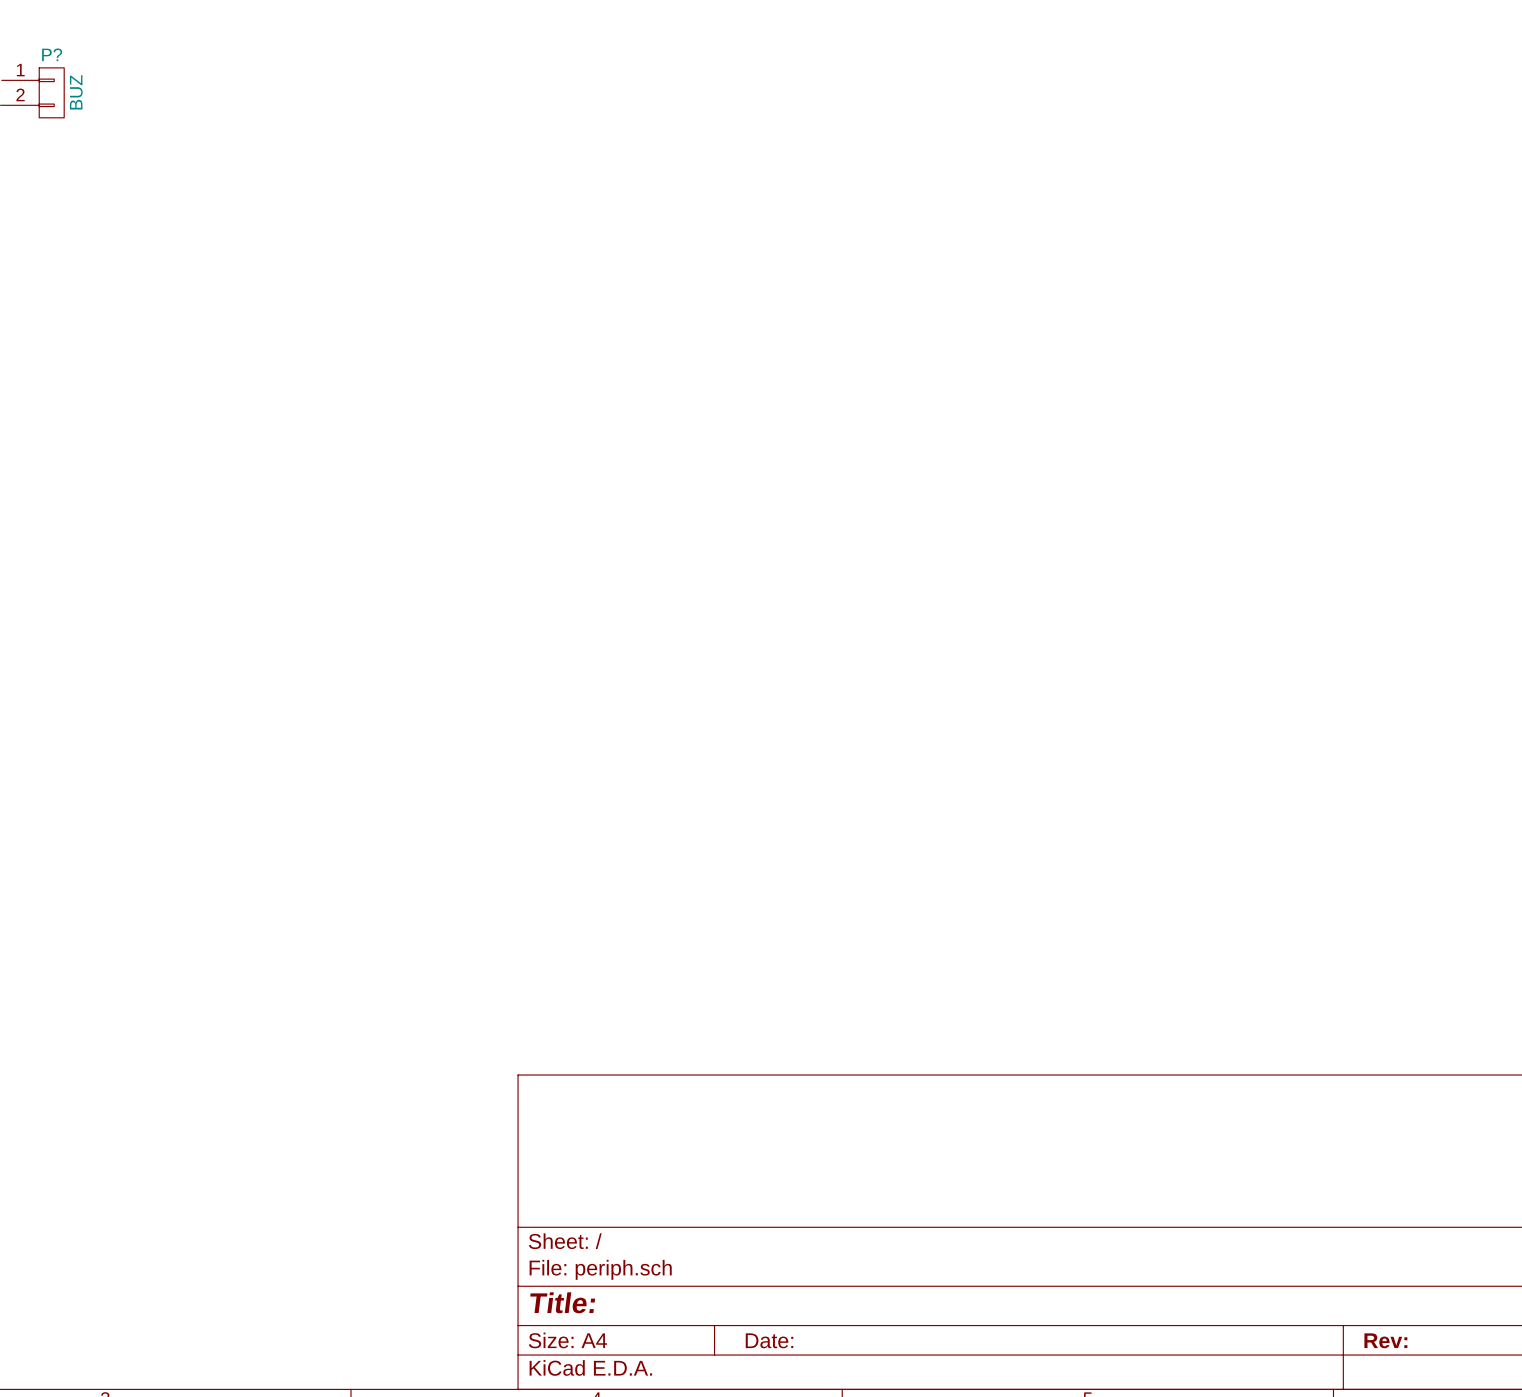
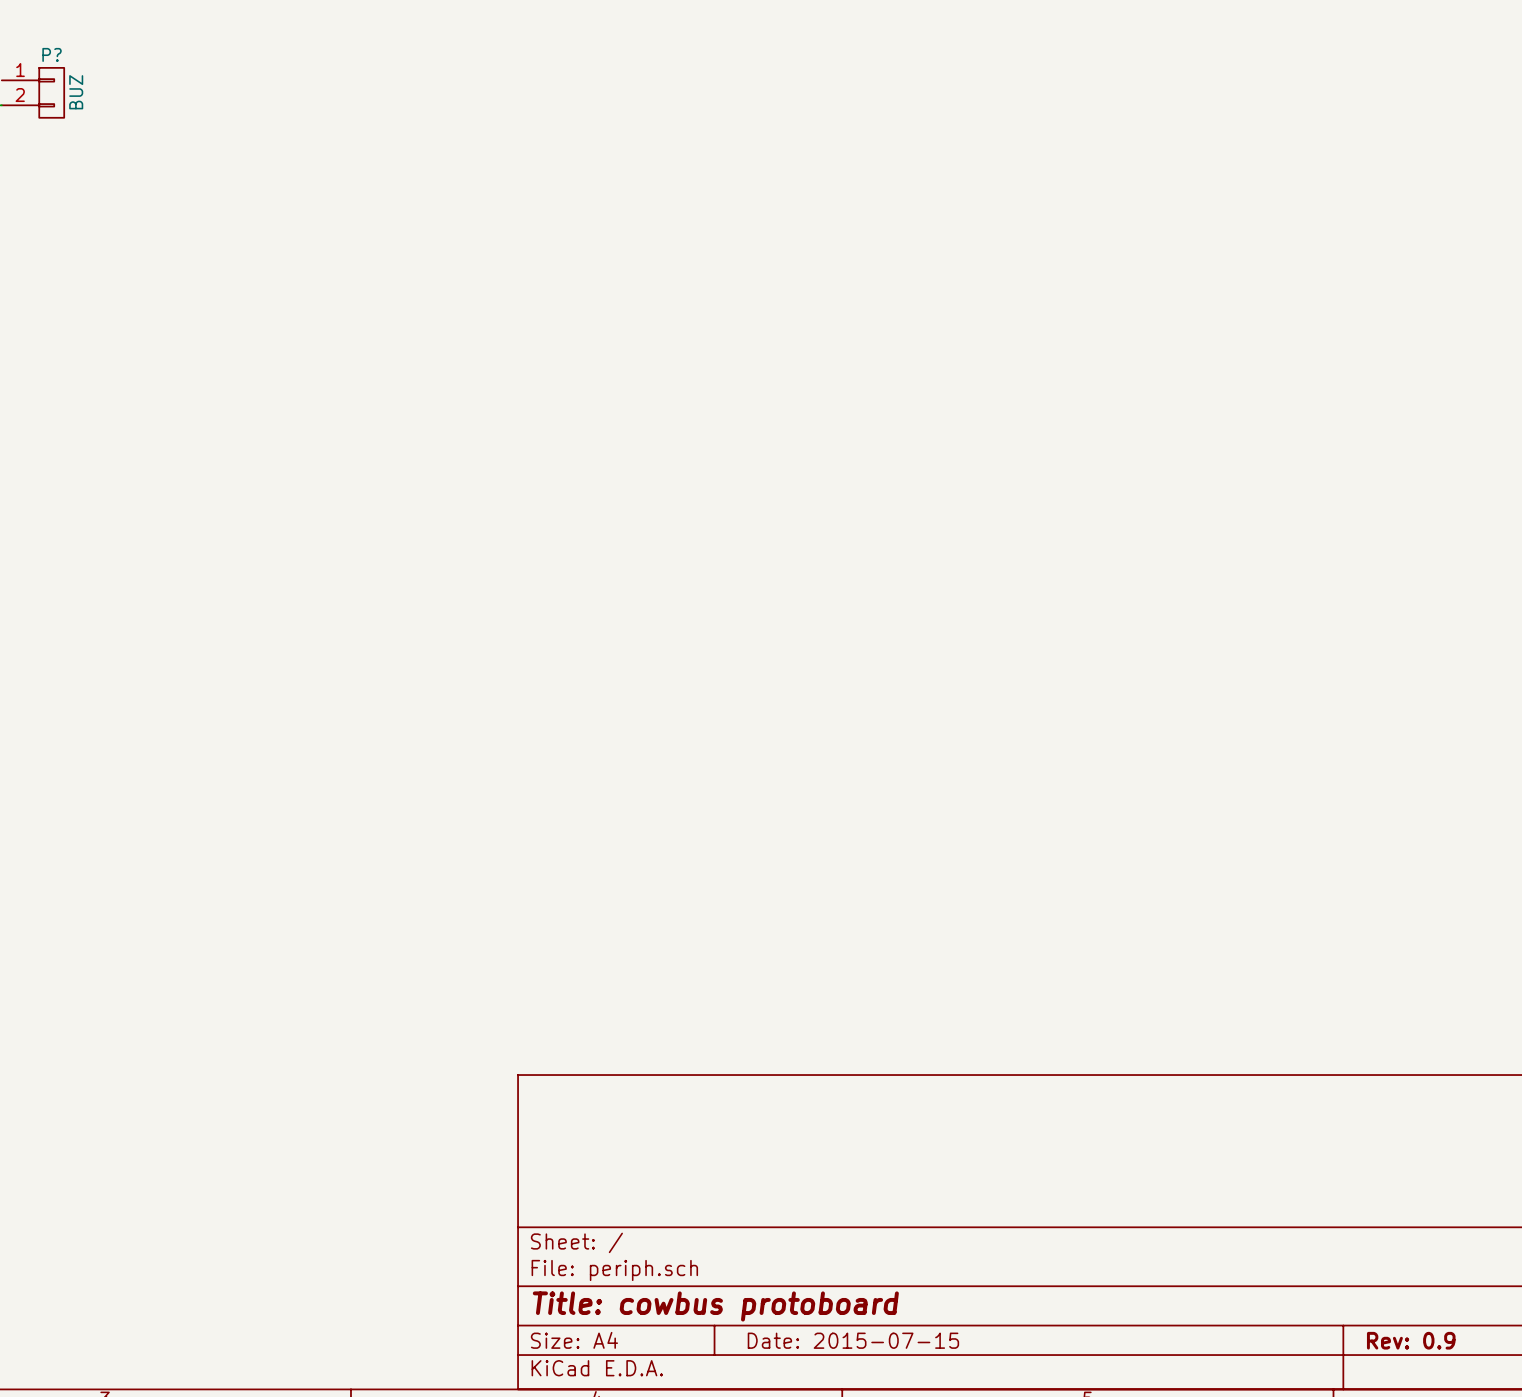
title block: Title: (562, 1302) -> Title: cowbus protoboard (715, 1306)
title block: Date: (769, 1340) -> Date: 2015-07-15 (853, 1340)
title block: Rev: (1385, 1340) -> Rev: 0.9 (1411, 1340)

